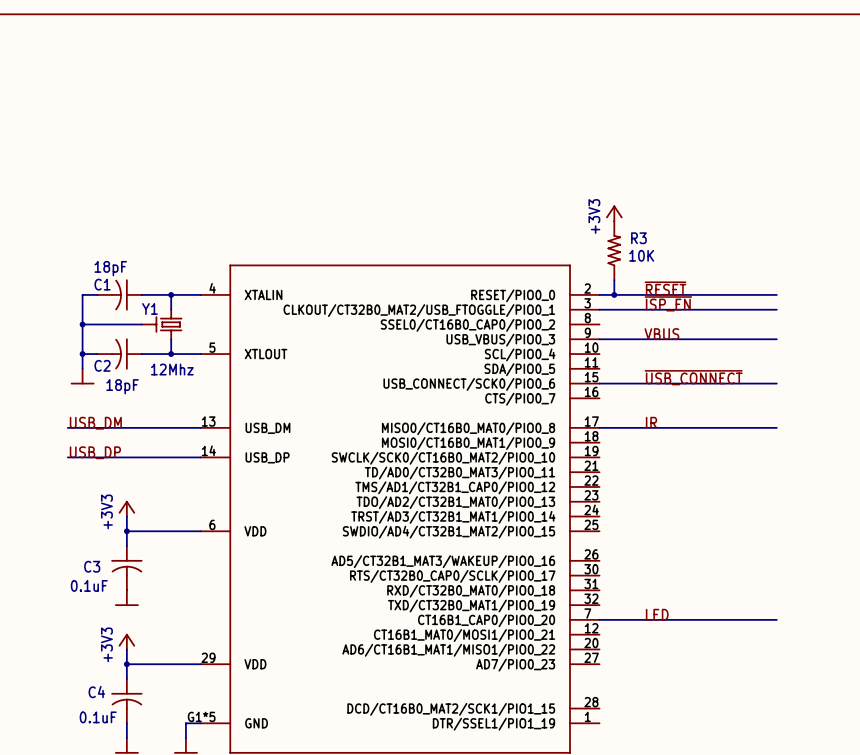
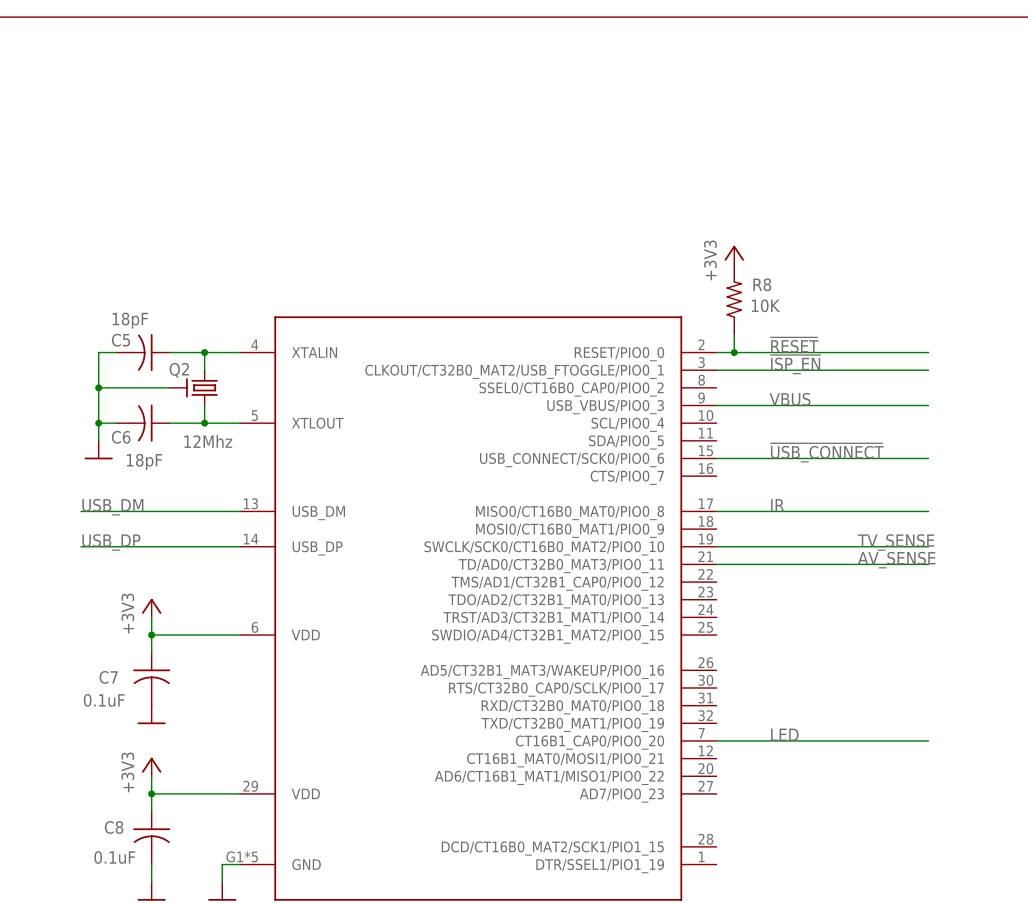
R3 name: R3 (638, 238) -> R8 (762, 284)
C1 name: C1 (102, 284) -> C5 (120, 340)
Y1 name: Y1 (149, 308) -> Q2 (179, 370)
C2 name: C2 (102, 365) -> C6 (121, 437)
label: none -> TV_SENSE (896, 542)
wire: none -> (716, 546) (928, 546)
label: none -> AV_SENSE (896, 560)
wire: none -> (716, 564) (928, 564)
C3 name: C3 (92, 566) -> C7 (108, 677)
C4 name: C4 (96, 692) -> C8 (114, 827)

